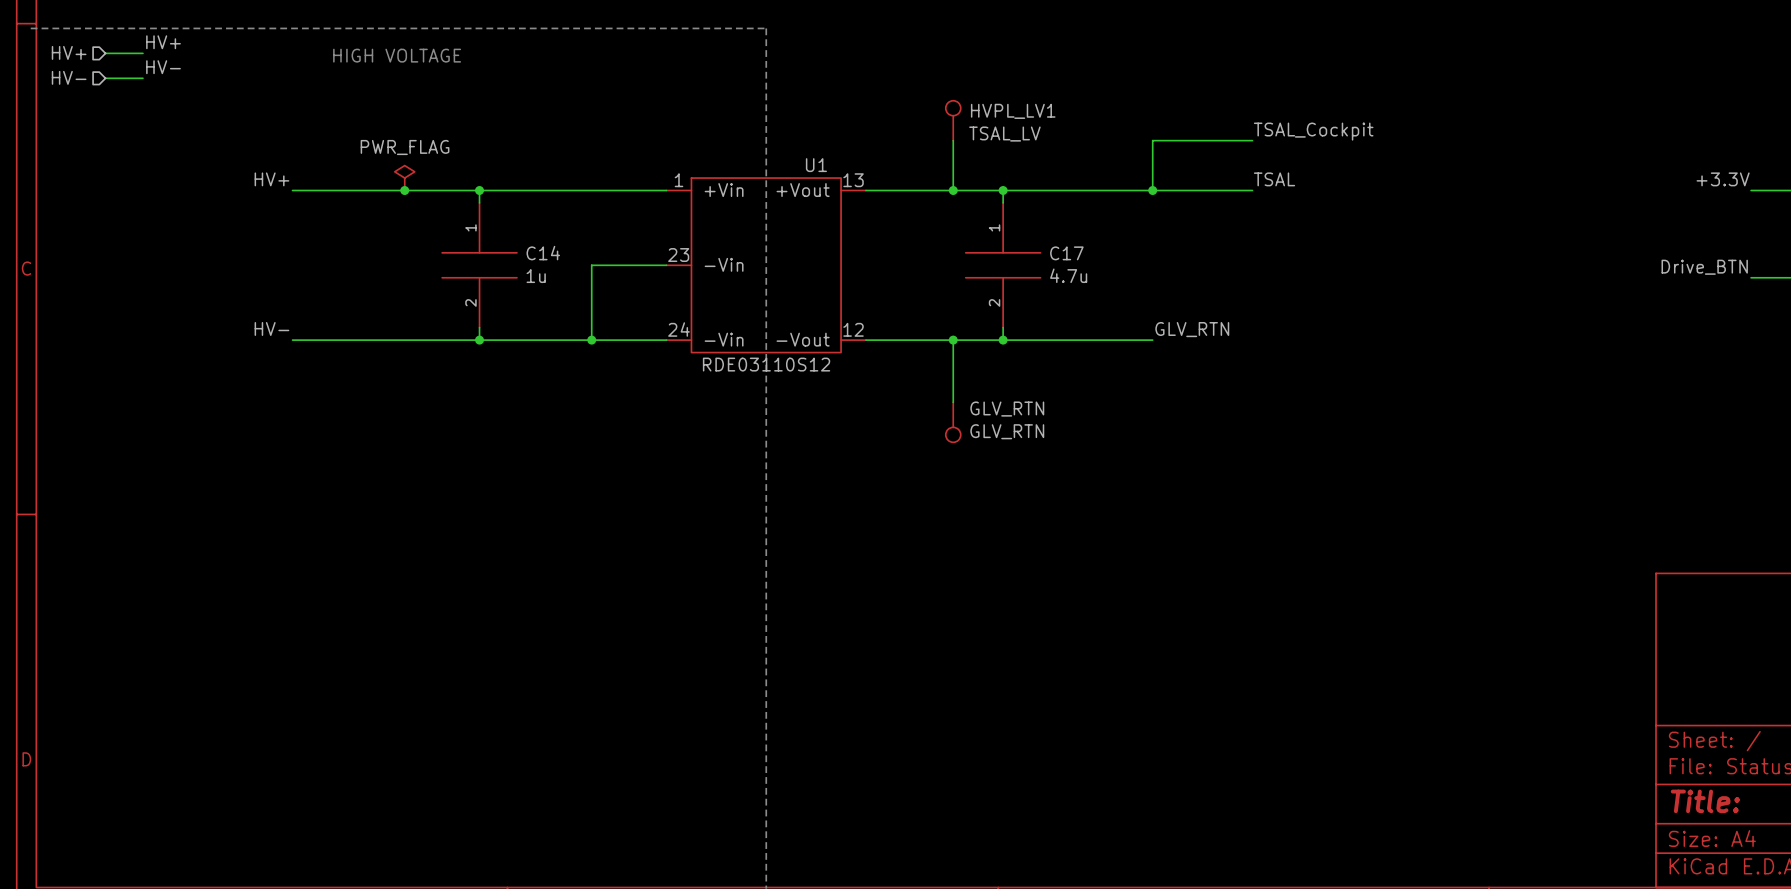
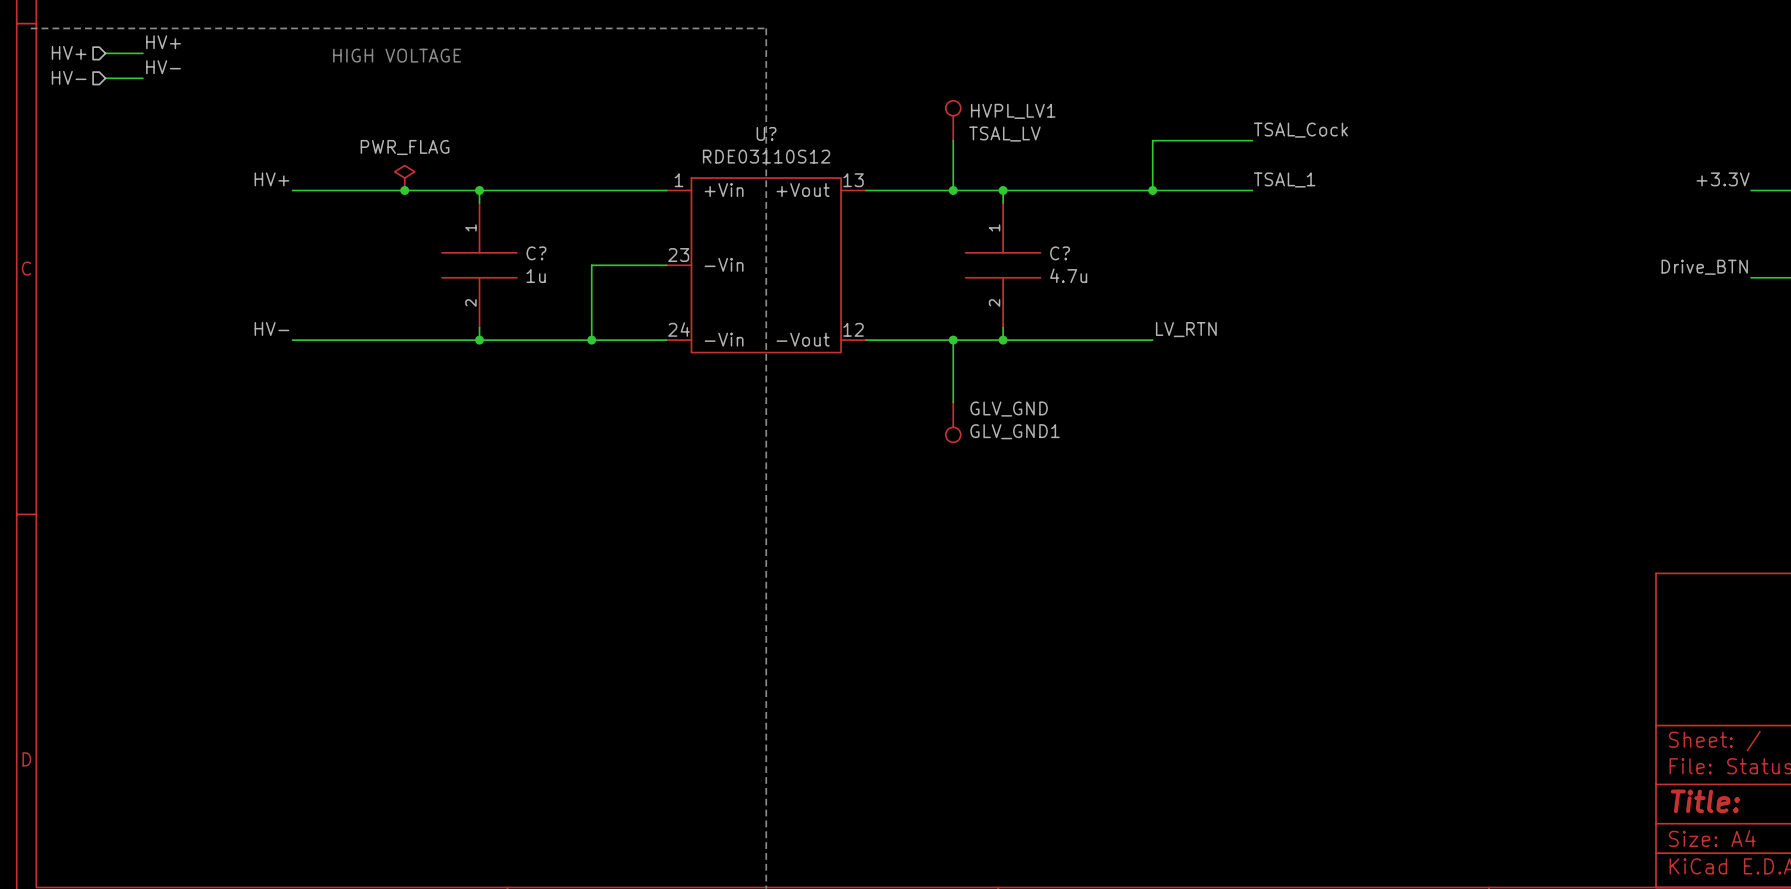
label: TSAL_Cockpit (1313, 131) -> TSAL_Cock (1300, 130)
U1 name: U1 (816, 165) -> U? (766, 133)
label: TSAL (1274, 179) -> TSAL_1 (1284, 179)
C14 name: C14 (543, 253) -> C? (536, 253)
C17 name: C17 (1066, 253) -> C? (1060, 253)
label: GLV_RTN (1192, 329) -> LV_RTN (1186, 329)
U1 value position: RDE03110S12 (766, 364) -> RDE03110S12 (766, 156)
GLV_RTN name: GLV_RTN (1007, 409) -> GLV_GND (1009, 409)
GLV_RTN value: GLV_RTN (1007, 431) -> GLV_GND1 (1015, 431)

